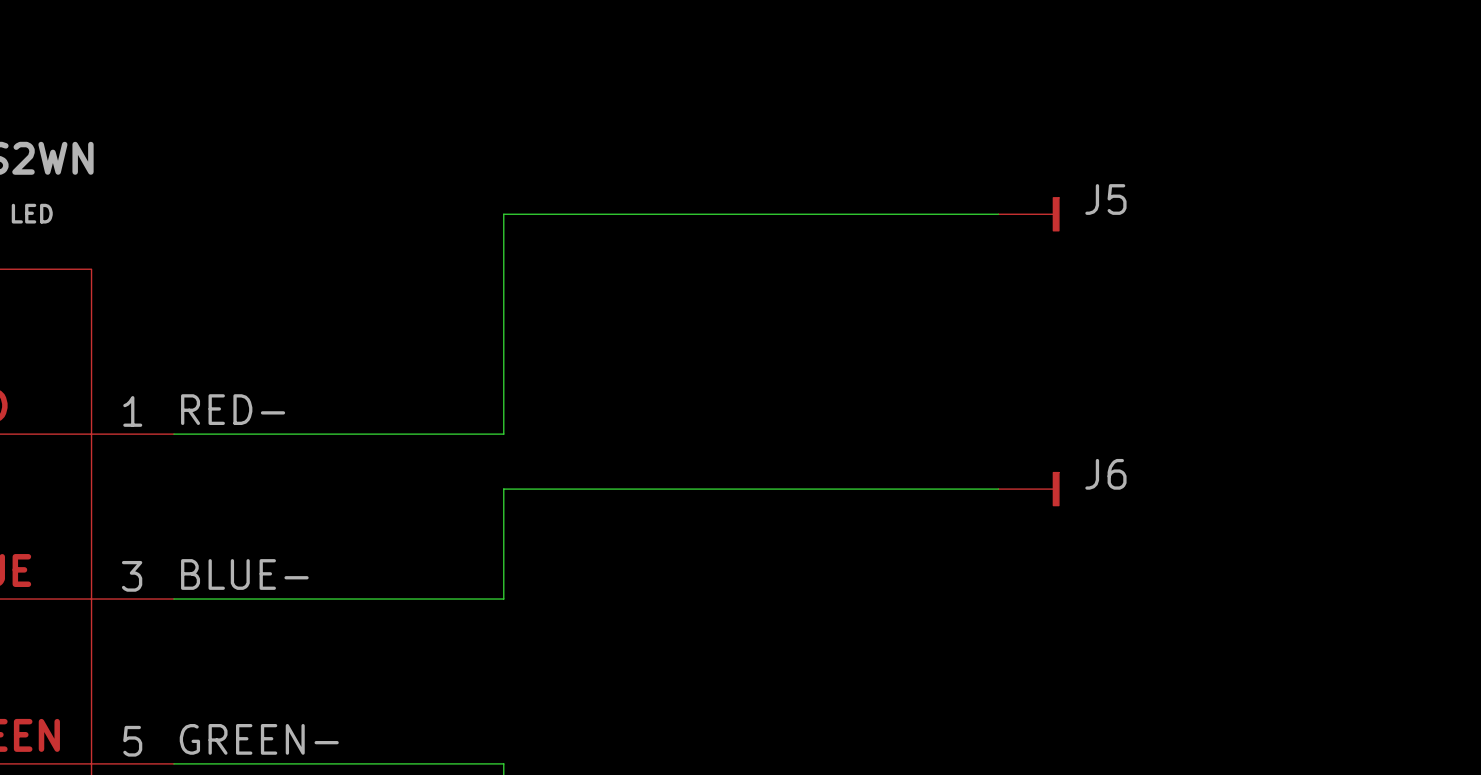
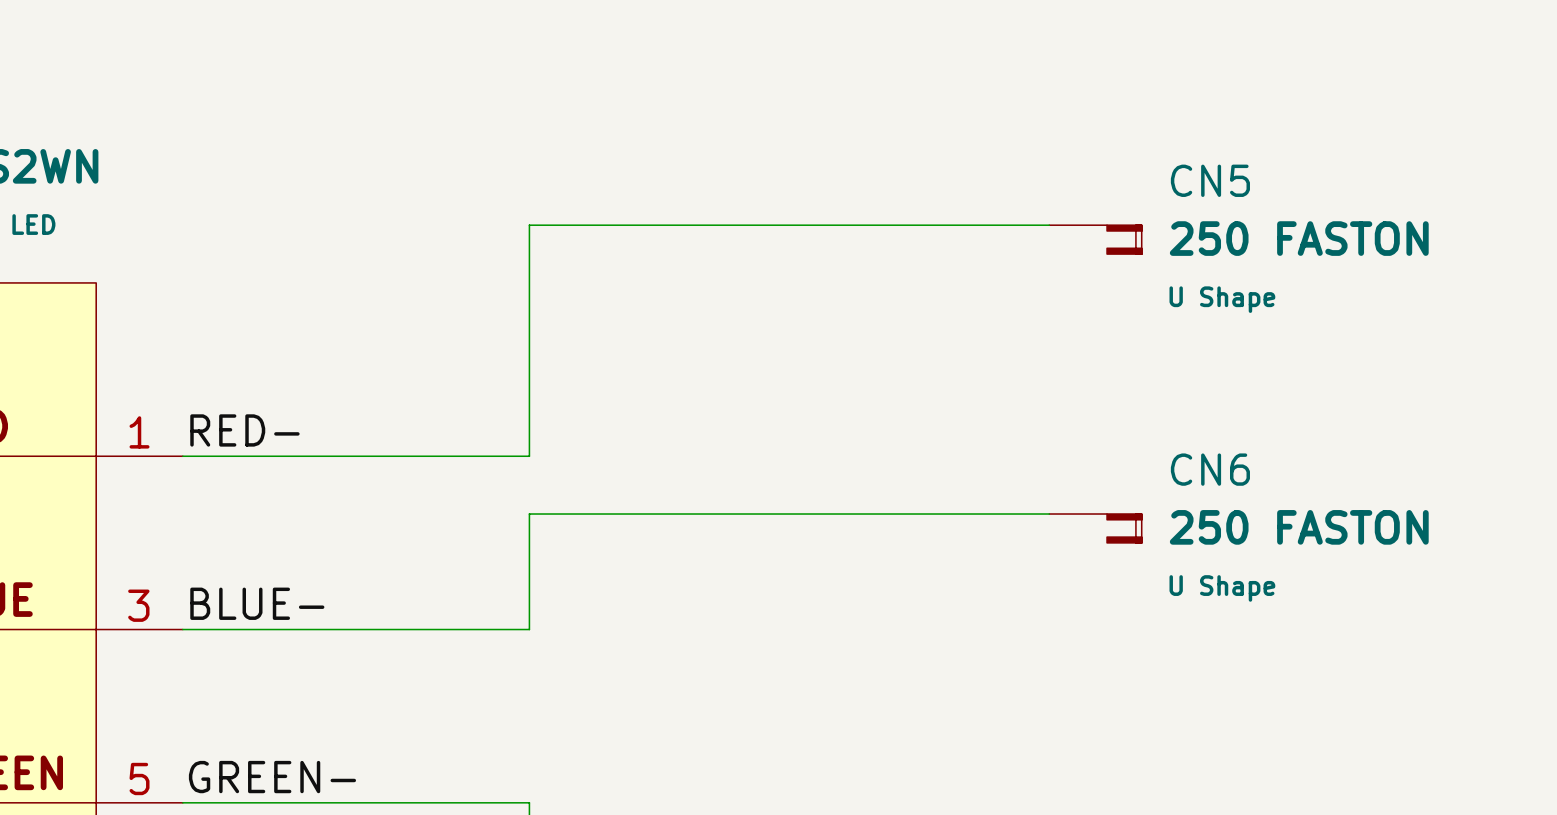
J5: (1028, 214) -> none
CN5: none -> 250 FASTON (1095, 239)
J6: (1028, 489) -> none
CN6: none -> 250 FASTON (1095, 528)

